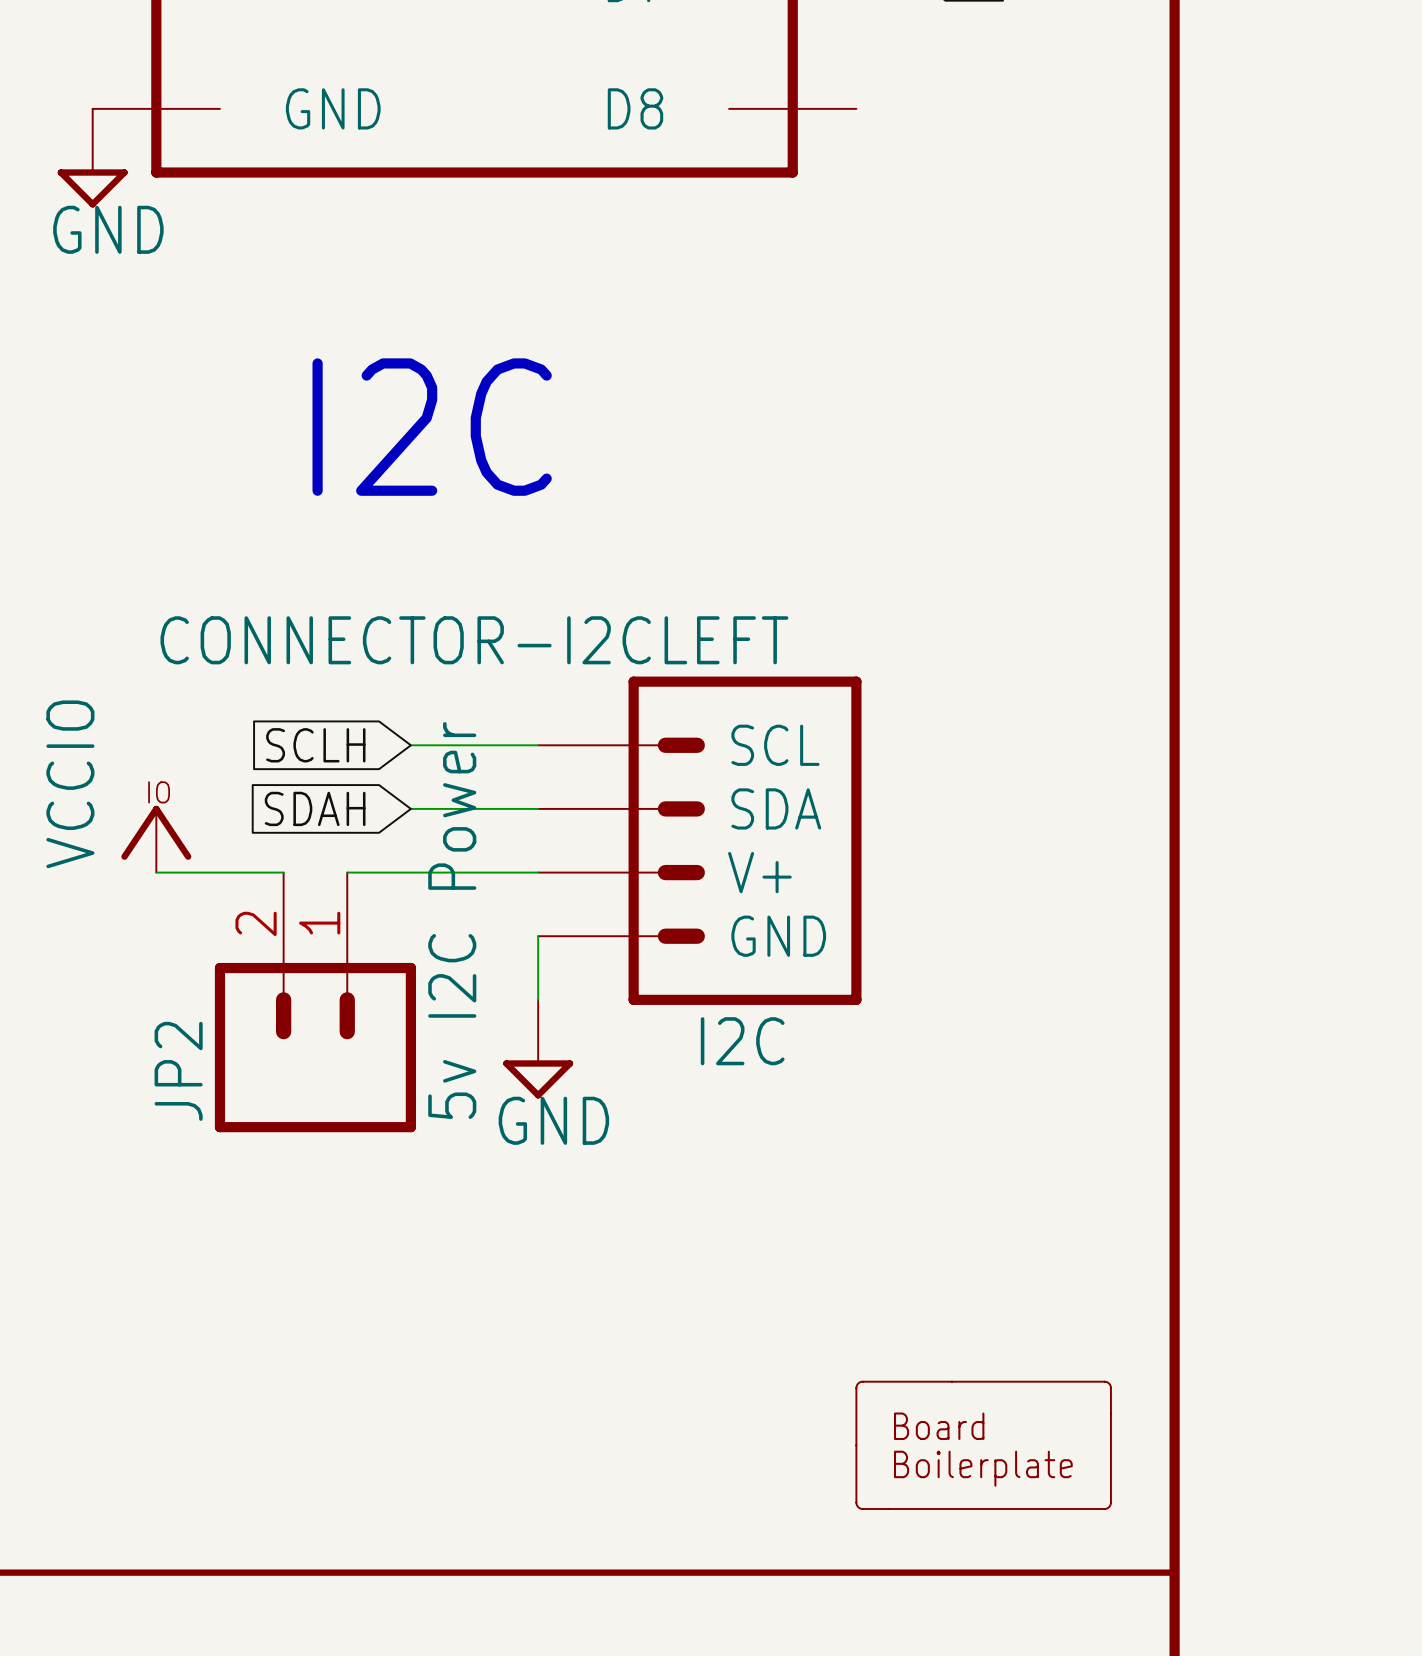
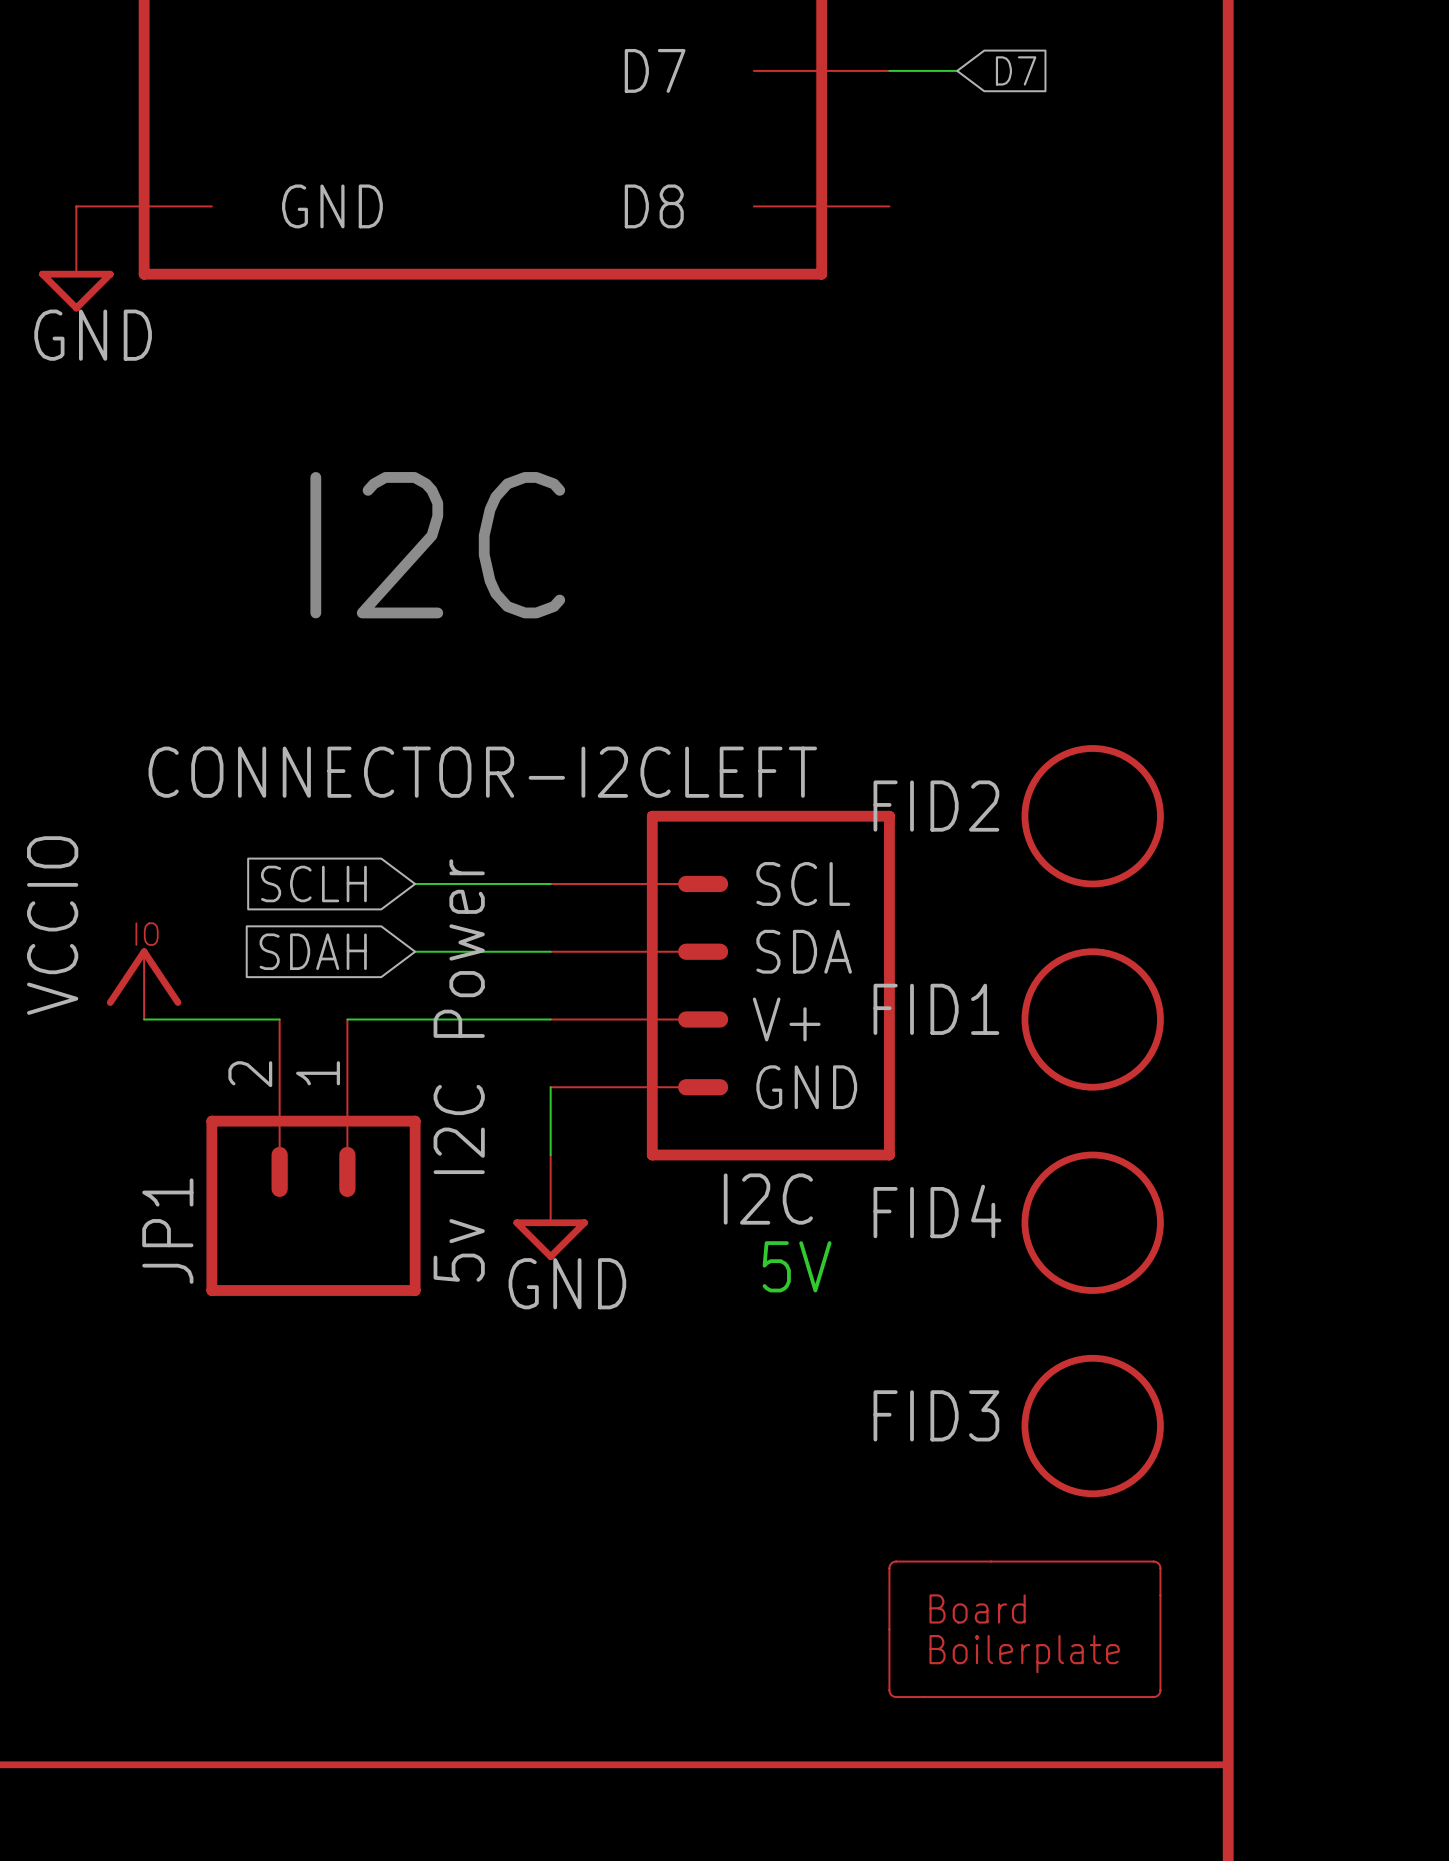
FID2: none -> (1092, 816)
FID1: none -> (1092, 1019)
FID4: none -> (1092, 1222)
JP2 name: JP2 (178, 1071) -> JP1 (167, 1231)
text: none -> 5V (797, 1266)
FID3: none -> (1092, 1426)

